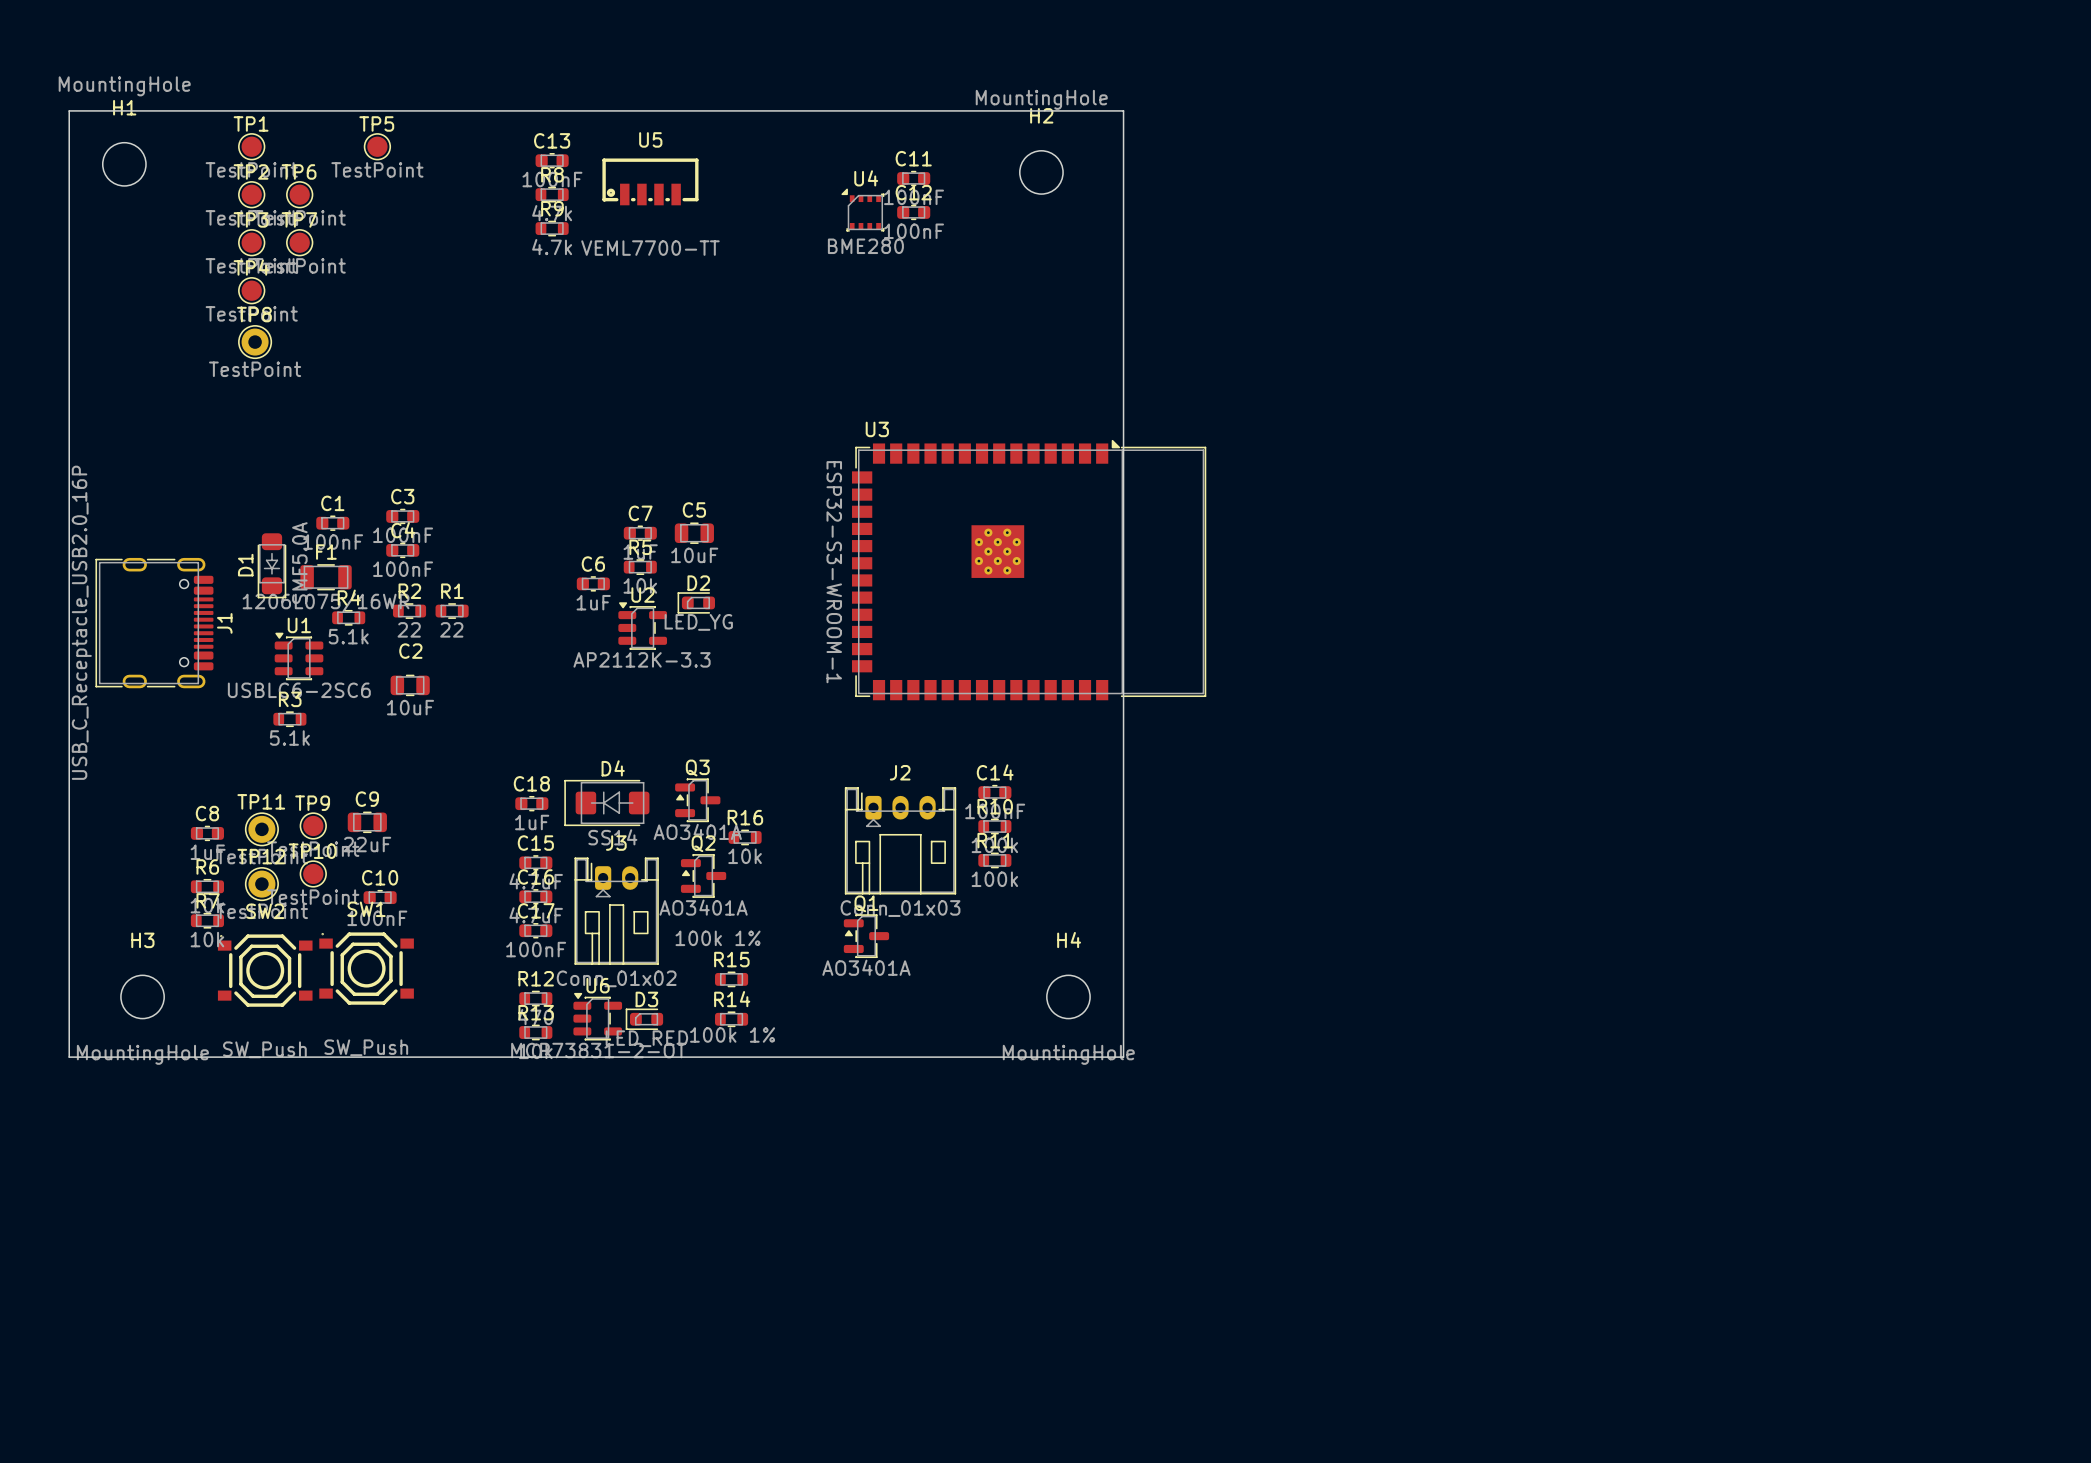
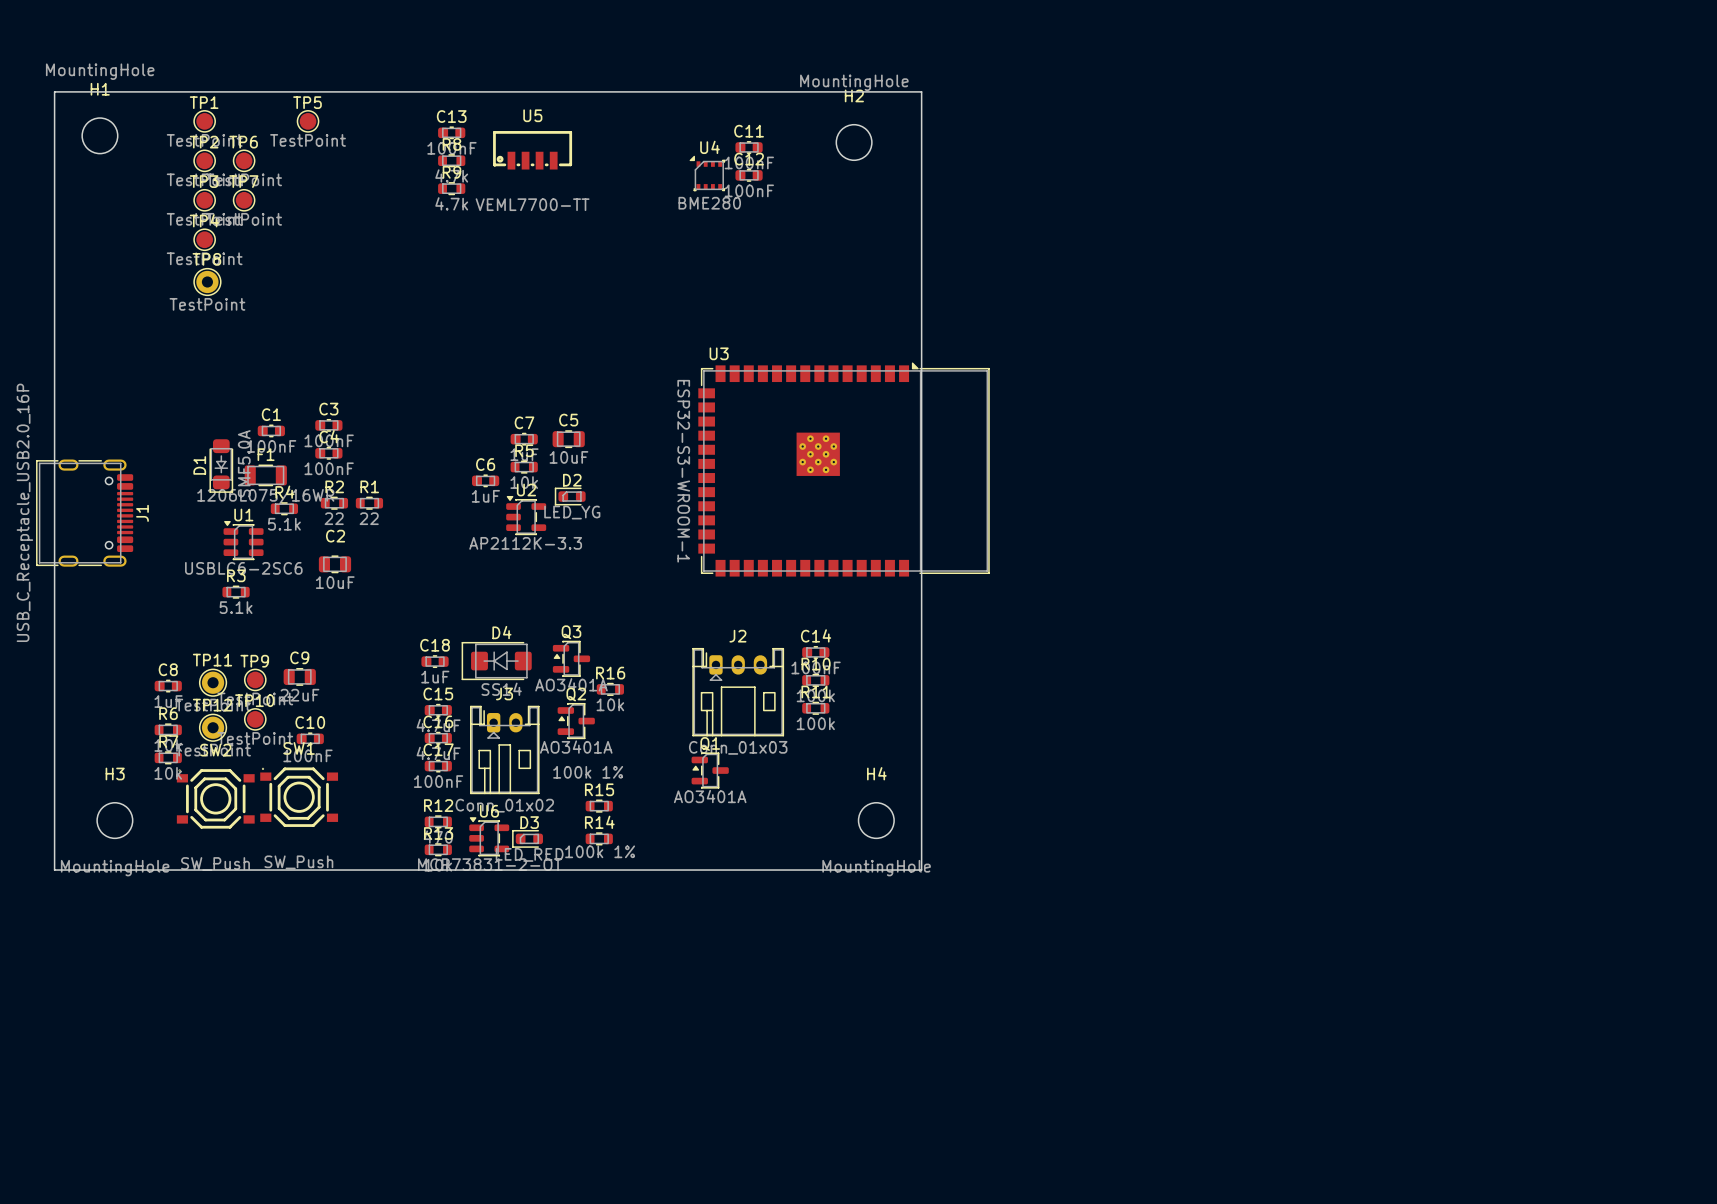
J1 position: (154, 623) -> (84, 513)

